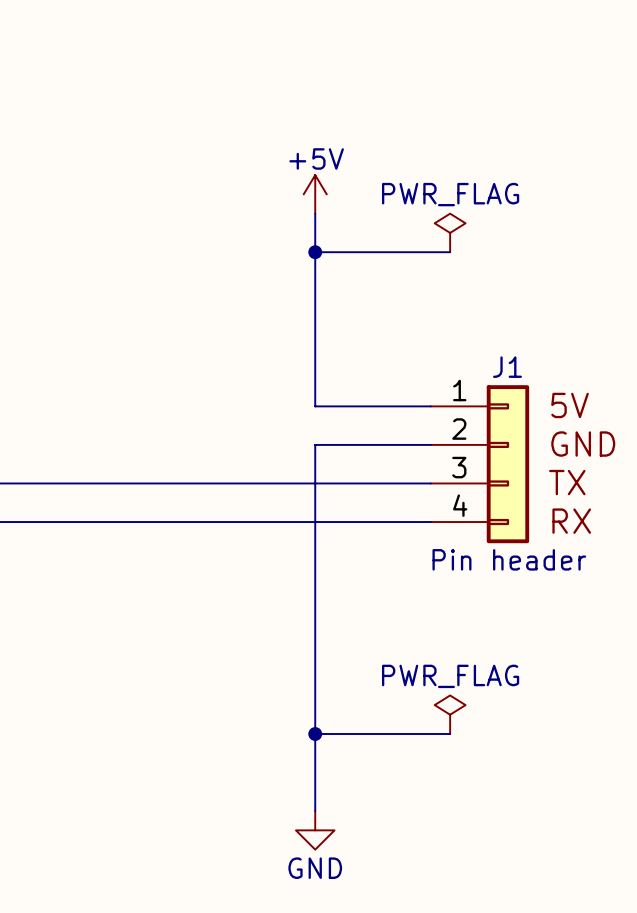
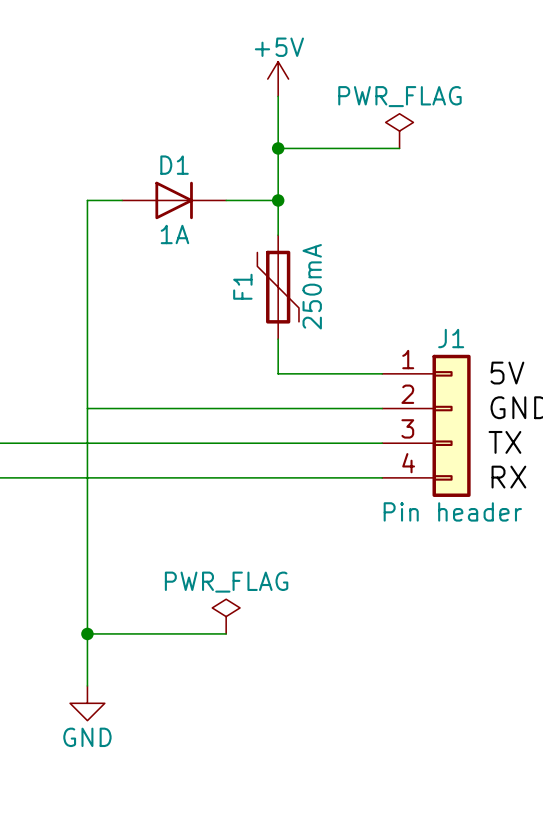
wire: none -> (278, 96) (278, 200) (226, 200)
wire: none -> (278, 148) (399, 148)
junction: none -> (278, 148)
power symbol position: +5V (315, 194) -> +5V (278, 79)
wire: none -> (122, 200) (87, 200) (87, 685)
D1: none -> 1A (174, 200)
power symbol position: PWR_FLAG (450, 232) -> PWR_FLAG (399, 131)
junction position: (315, 252) -> (278, 200)
wire: (450, 252) (315, 252) (315, 367) -> none
F1: none -> 250mA (278, 287)
wire: (315, 444) (315, 811) -> (278, 408) (87, 408)
wire: none -> (87, 633) (226, 633)
junction: none -> (87, 633)
power symbol position: PWR_FLAG (450, 714) -> PWR_FLAG (226, 616)
wire: (315, 734) (450, 734) -> none
junction: (315, 734) -> none
power symbol position: GND (315, 830) -> GND (87, 703)

